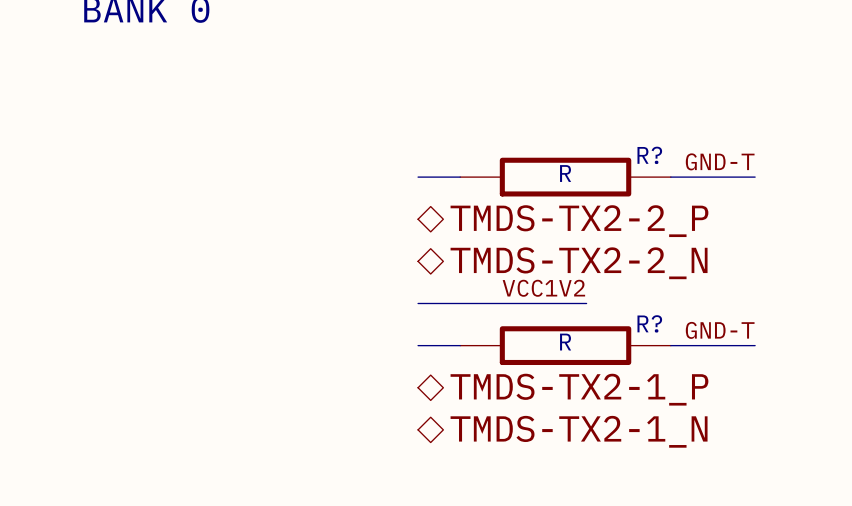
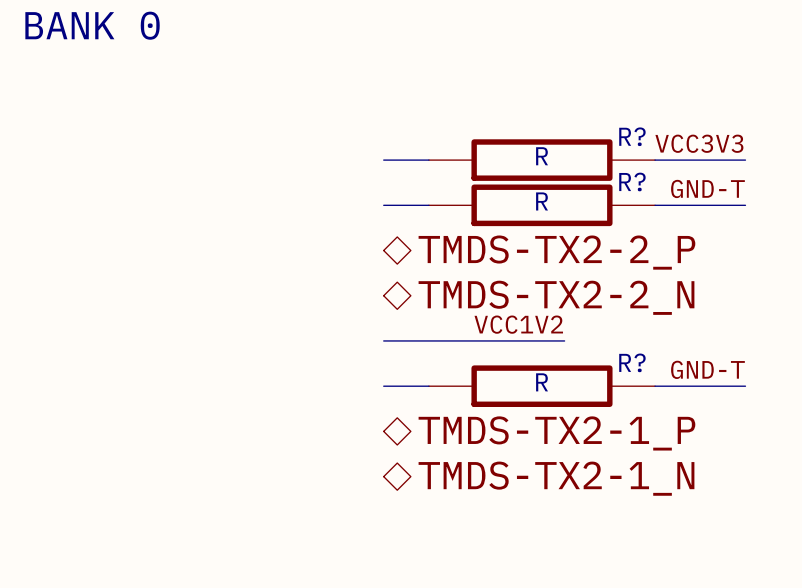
label: none -> VCC3V3 (699, 143)
wire: none -> (383, 160) (428, 160)
R?: none -> R (541, 160)
wire: none -> (655, 160) (745, 160)

